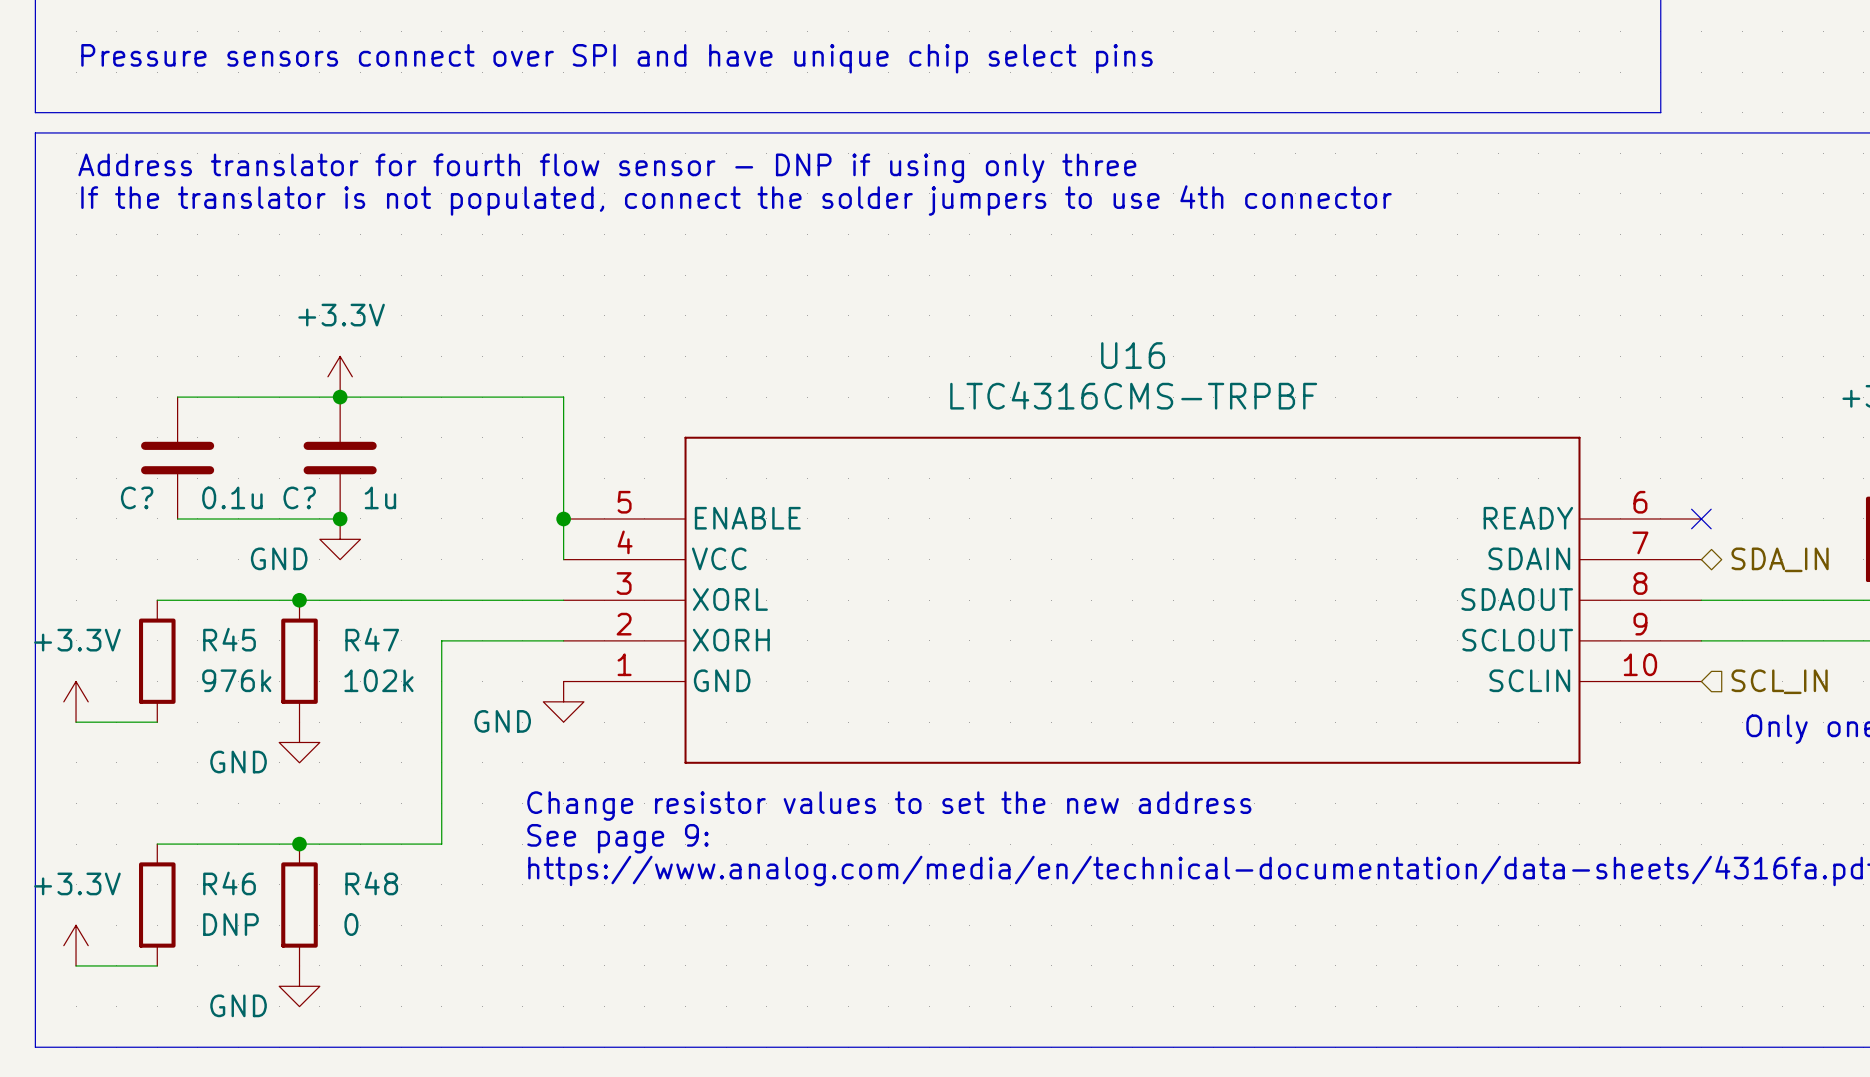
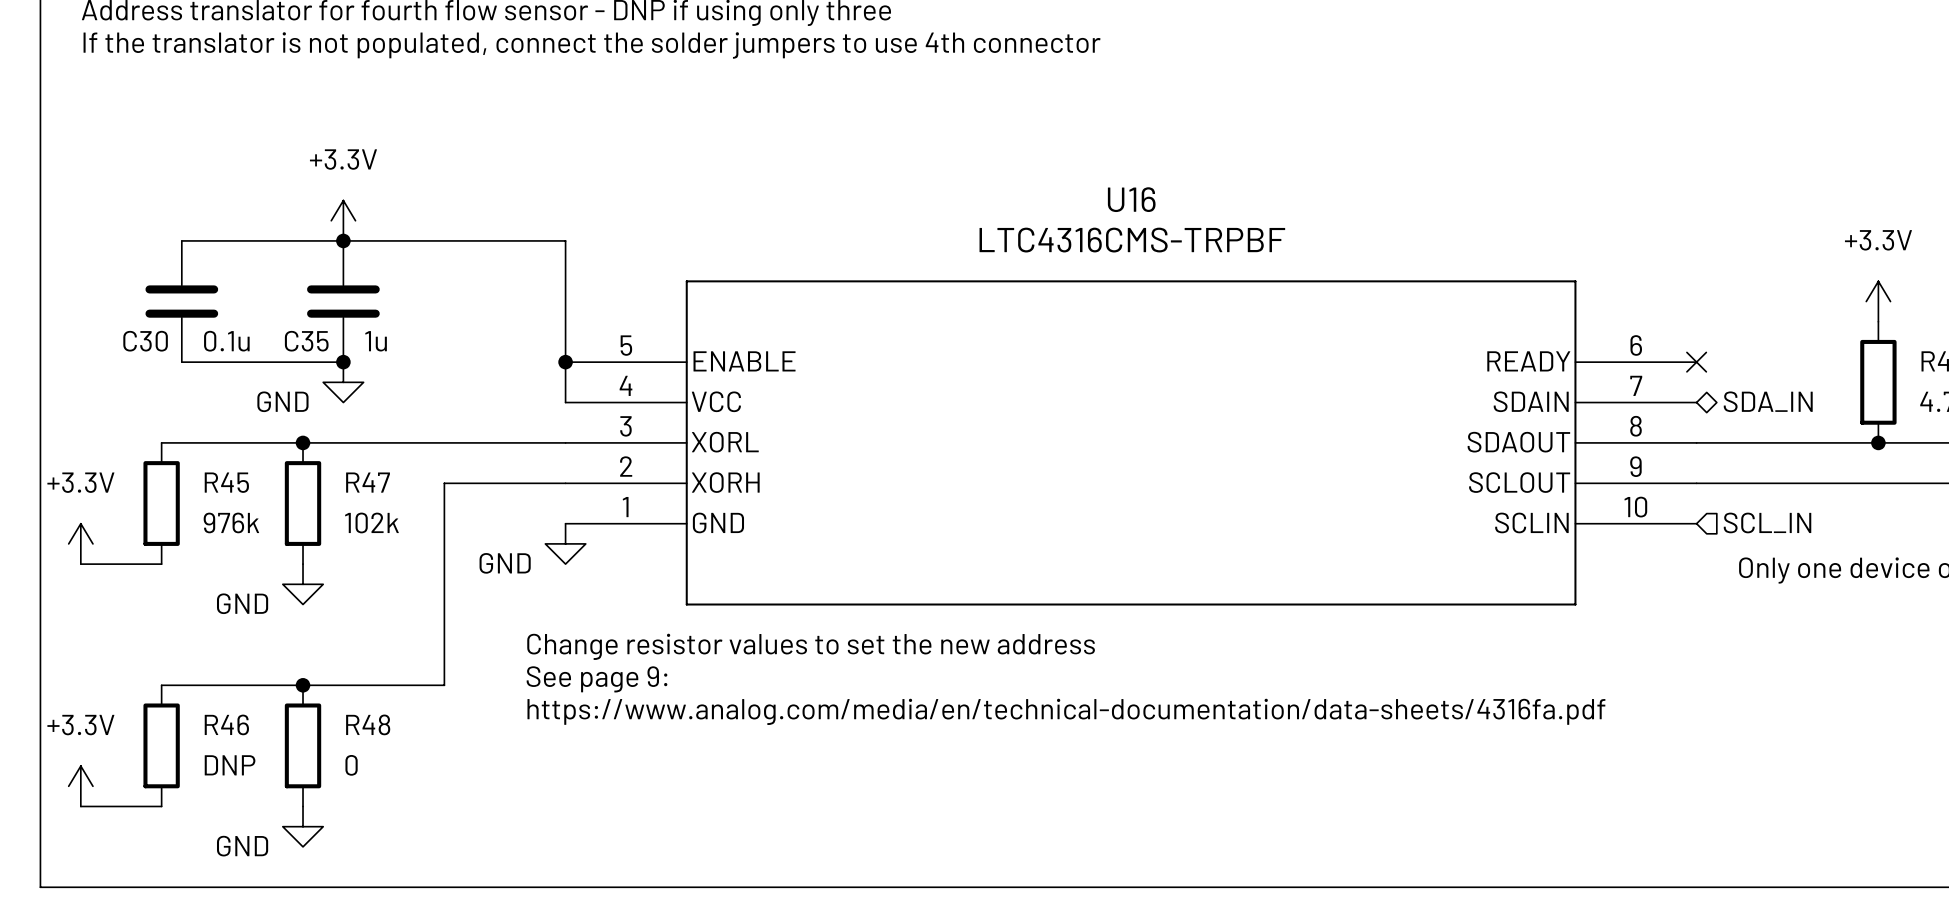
C? name: C? (137, 497) -> C30 (145, 341)
C? name: C? (299, 497) -> C35 (306, 341)

